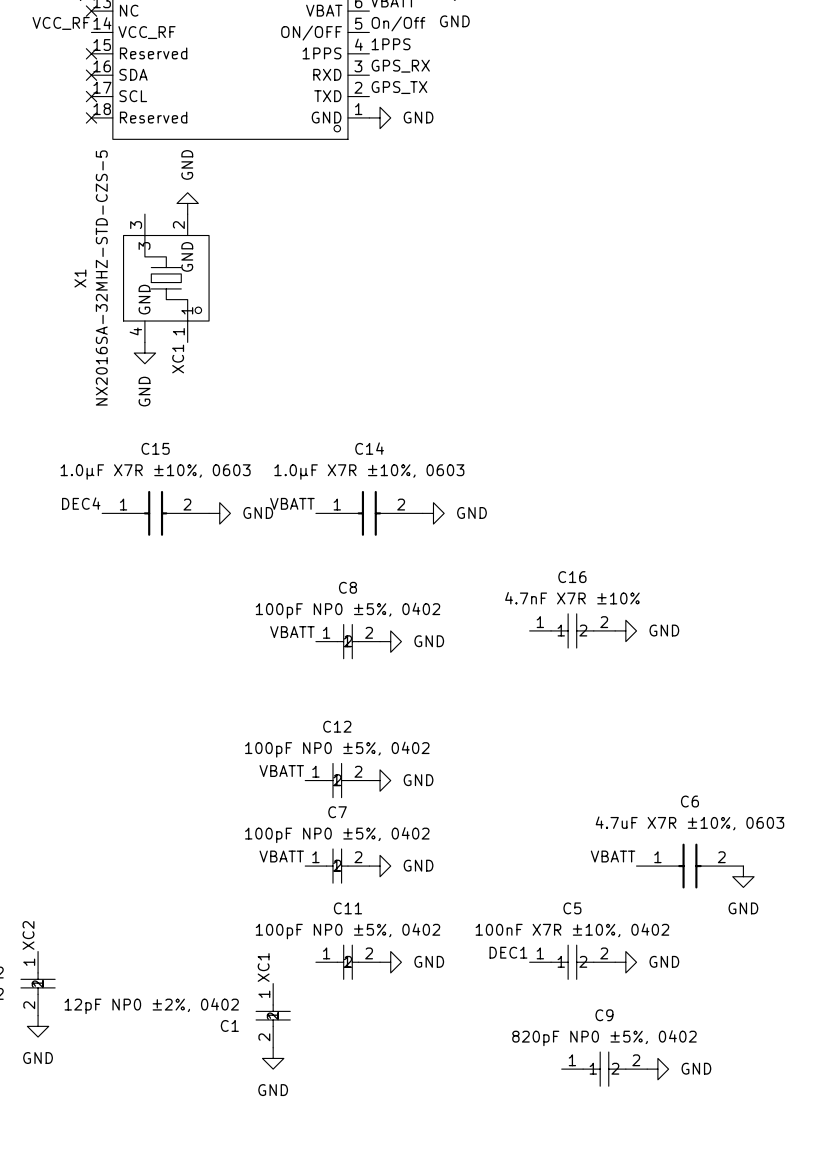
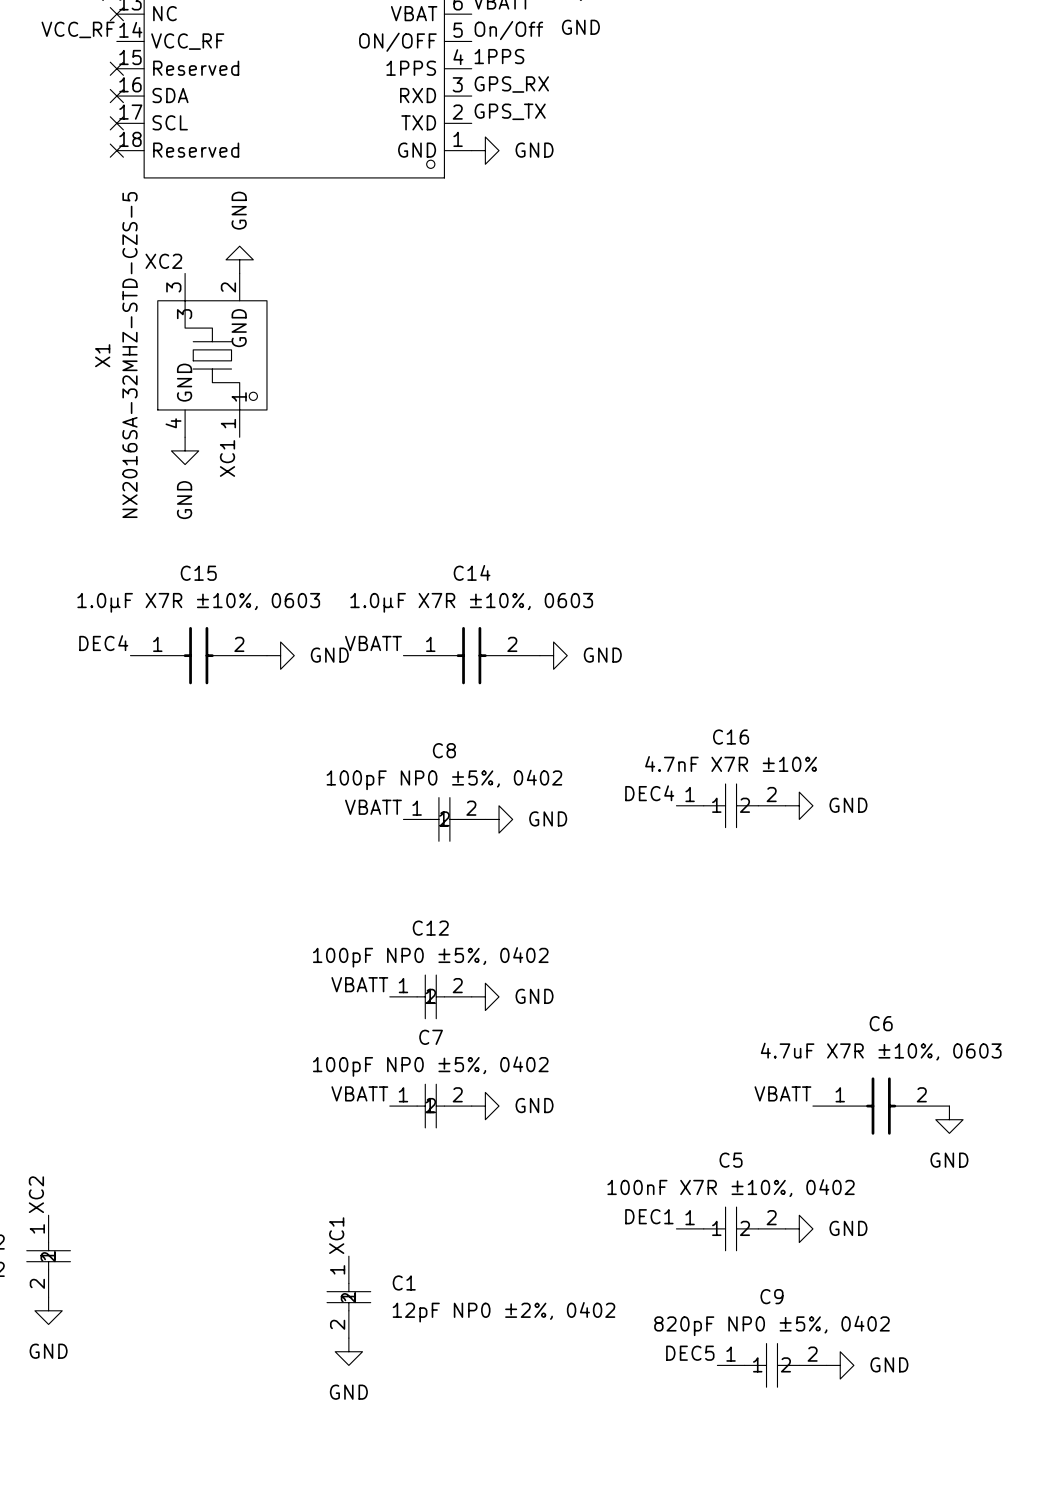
label: none -> XC2 (163, 261)
label: none -> DEC4 (649, 793)
C11: 100pF NP0 ±5%, 0402 (347, 962) -> none
power symbol: GND (390, 962) -> none
C1 value position: 12pF NP0 ±2%, 0402 (151, 1006) -> 12pF NP0 ±2%, 0402 (503, 1312)
C1 name position: C1 (229, 1025) -> C1 (404, 1282)
label: none -> DEC5 (690, 1353)

